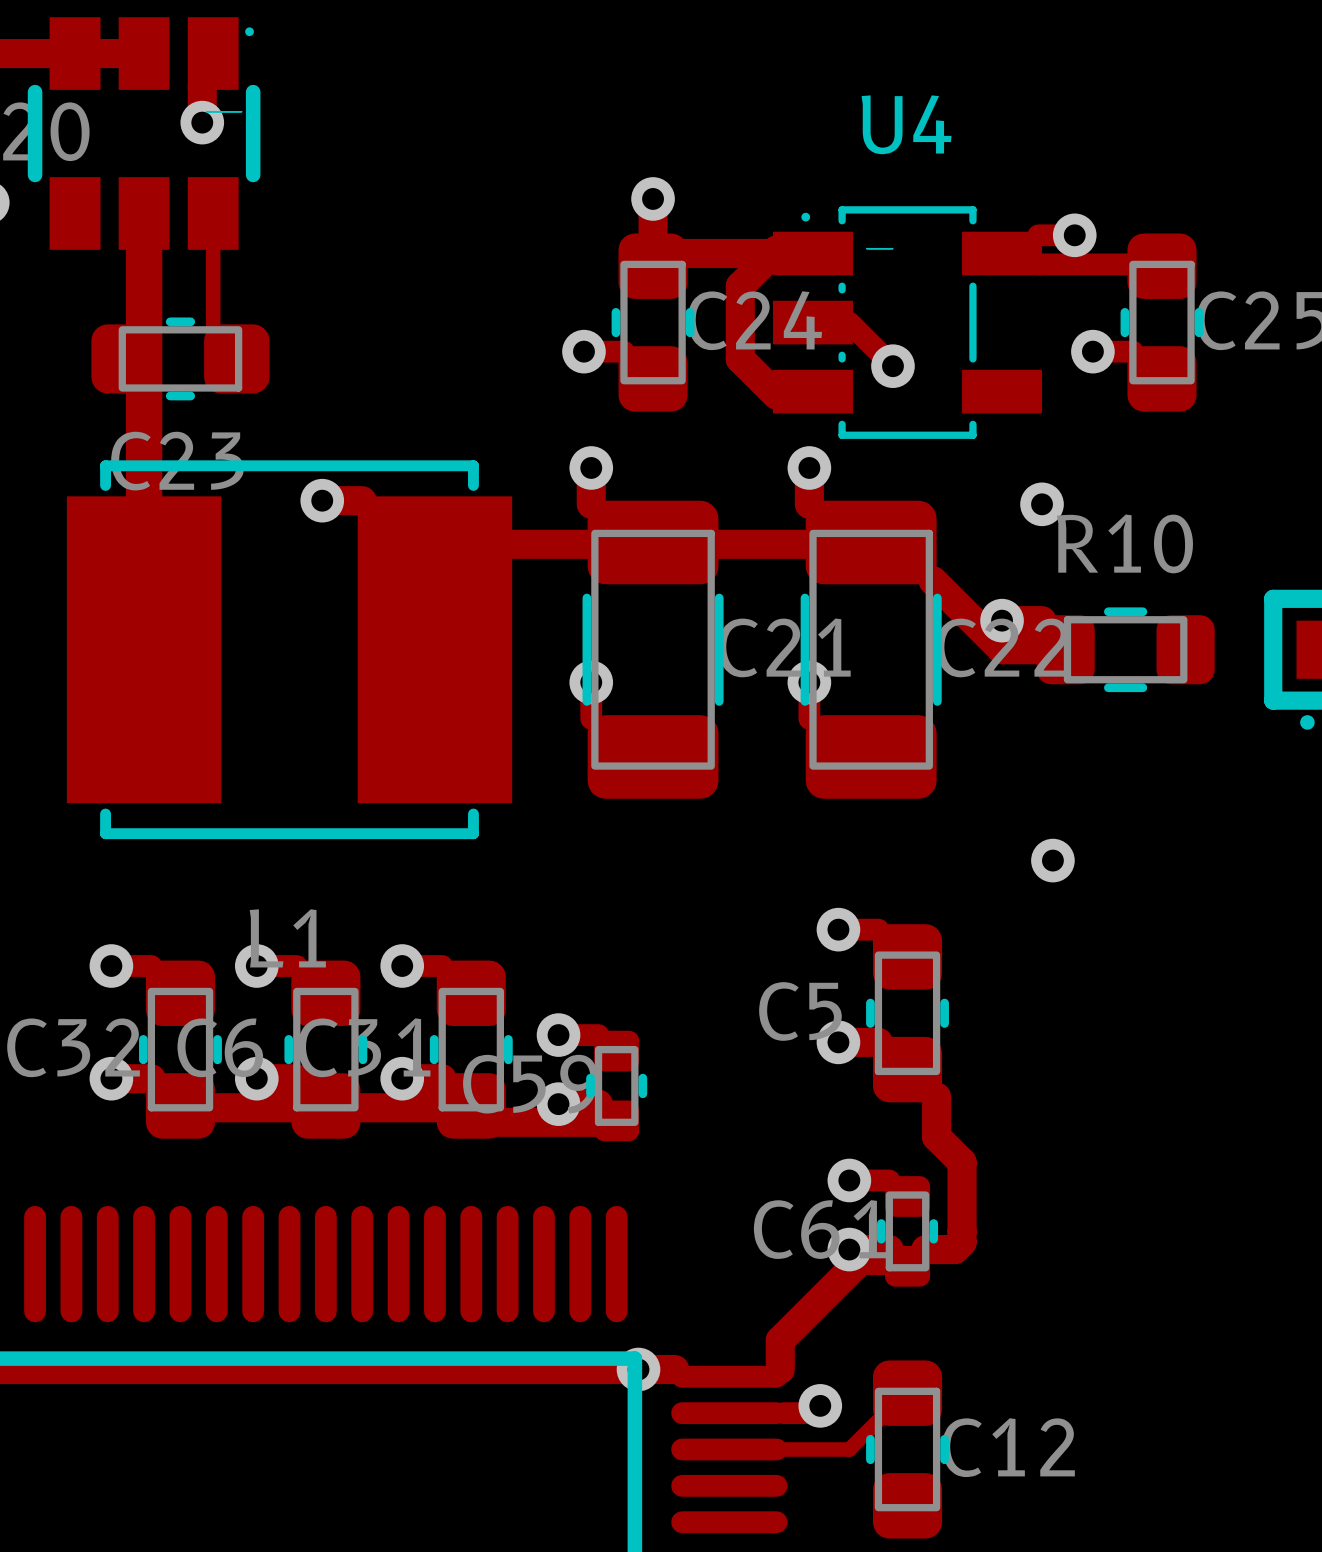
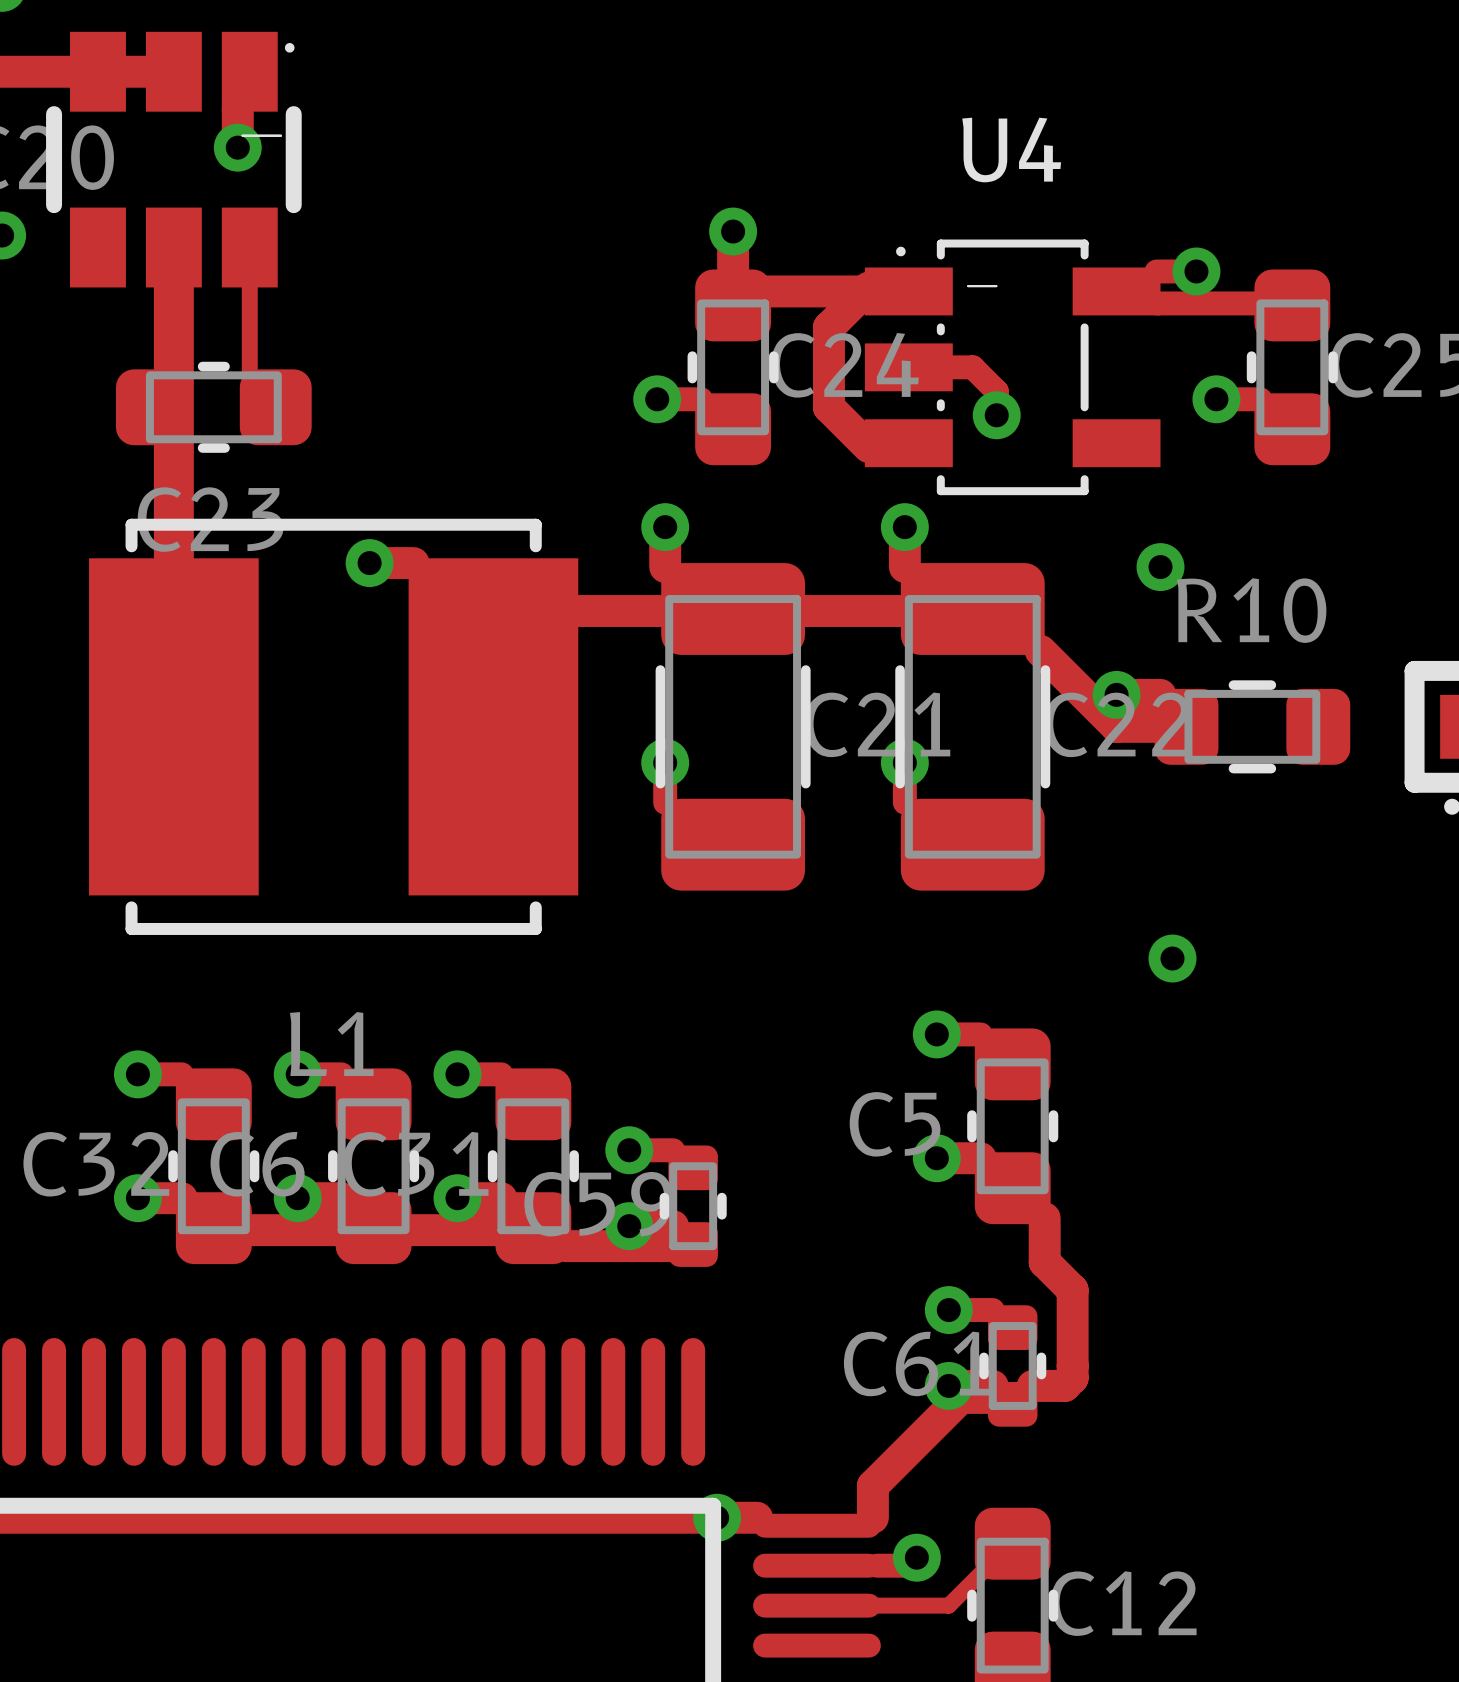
track: (849, 322) (892, 366) -> (948, 367) (972, 367) (996, 391) (996, 415)

